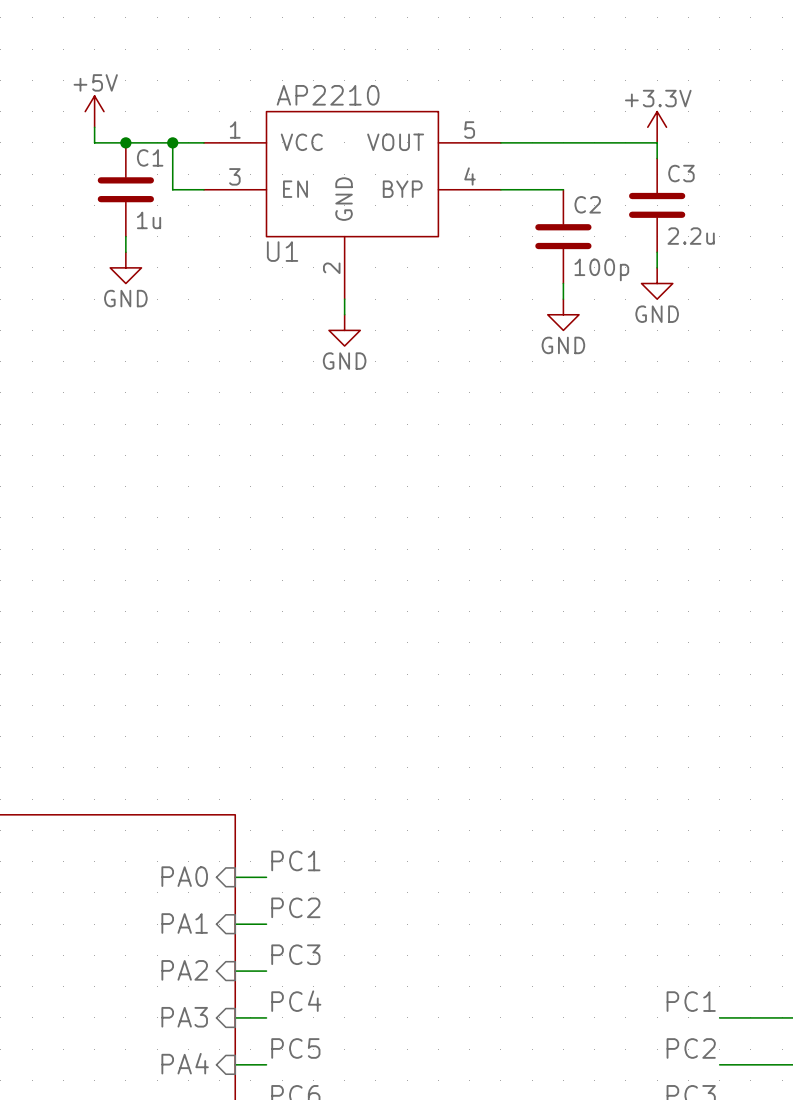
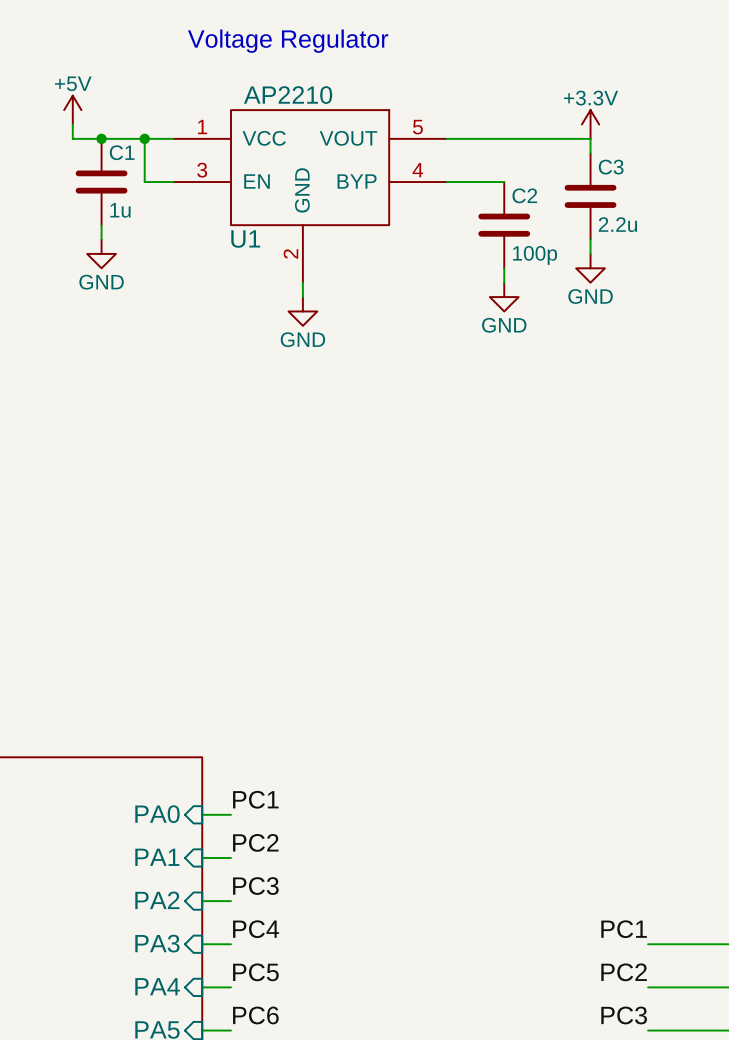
text: none -> Voltage Regulator (288, 41)

